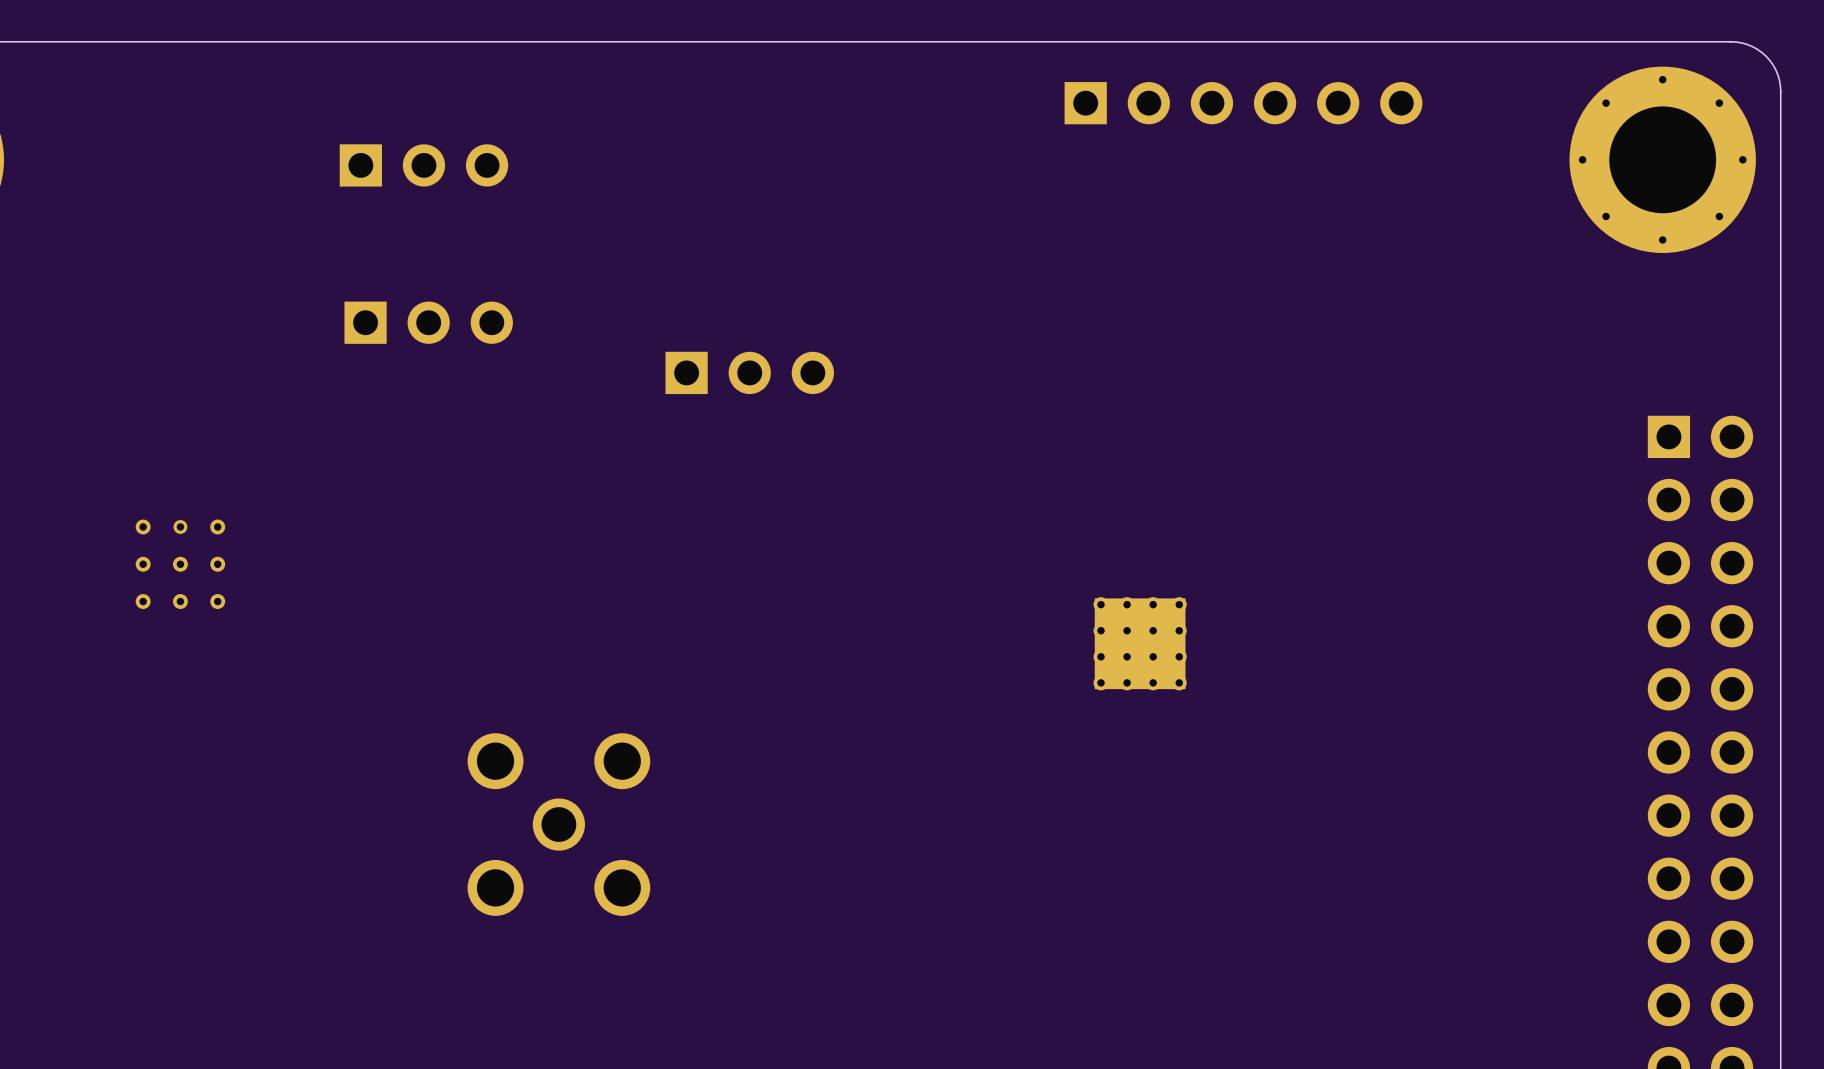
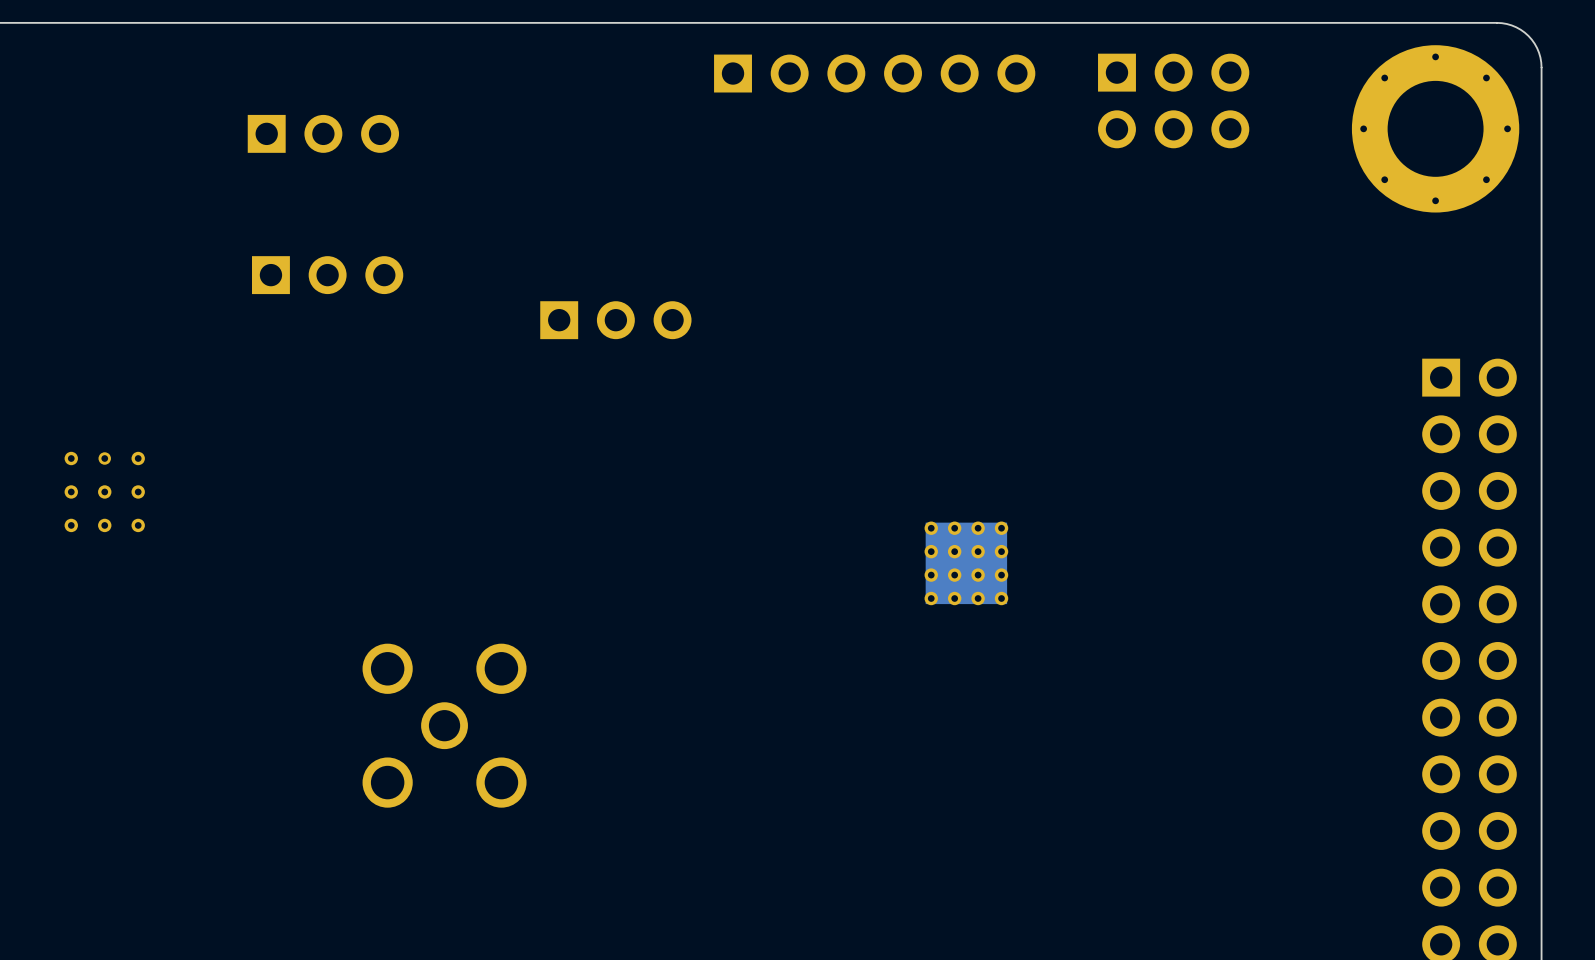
part position: (1243, 103) -> (874, 73)
part: none -> (1173, 100)

